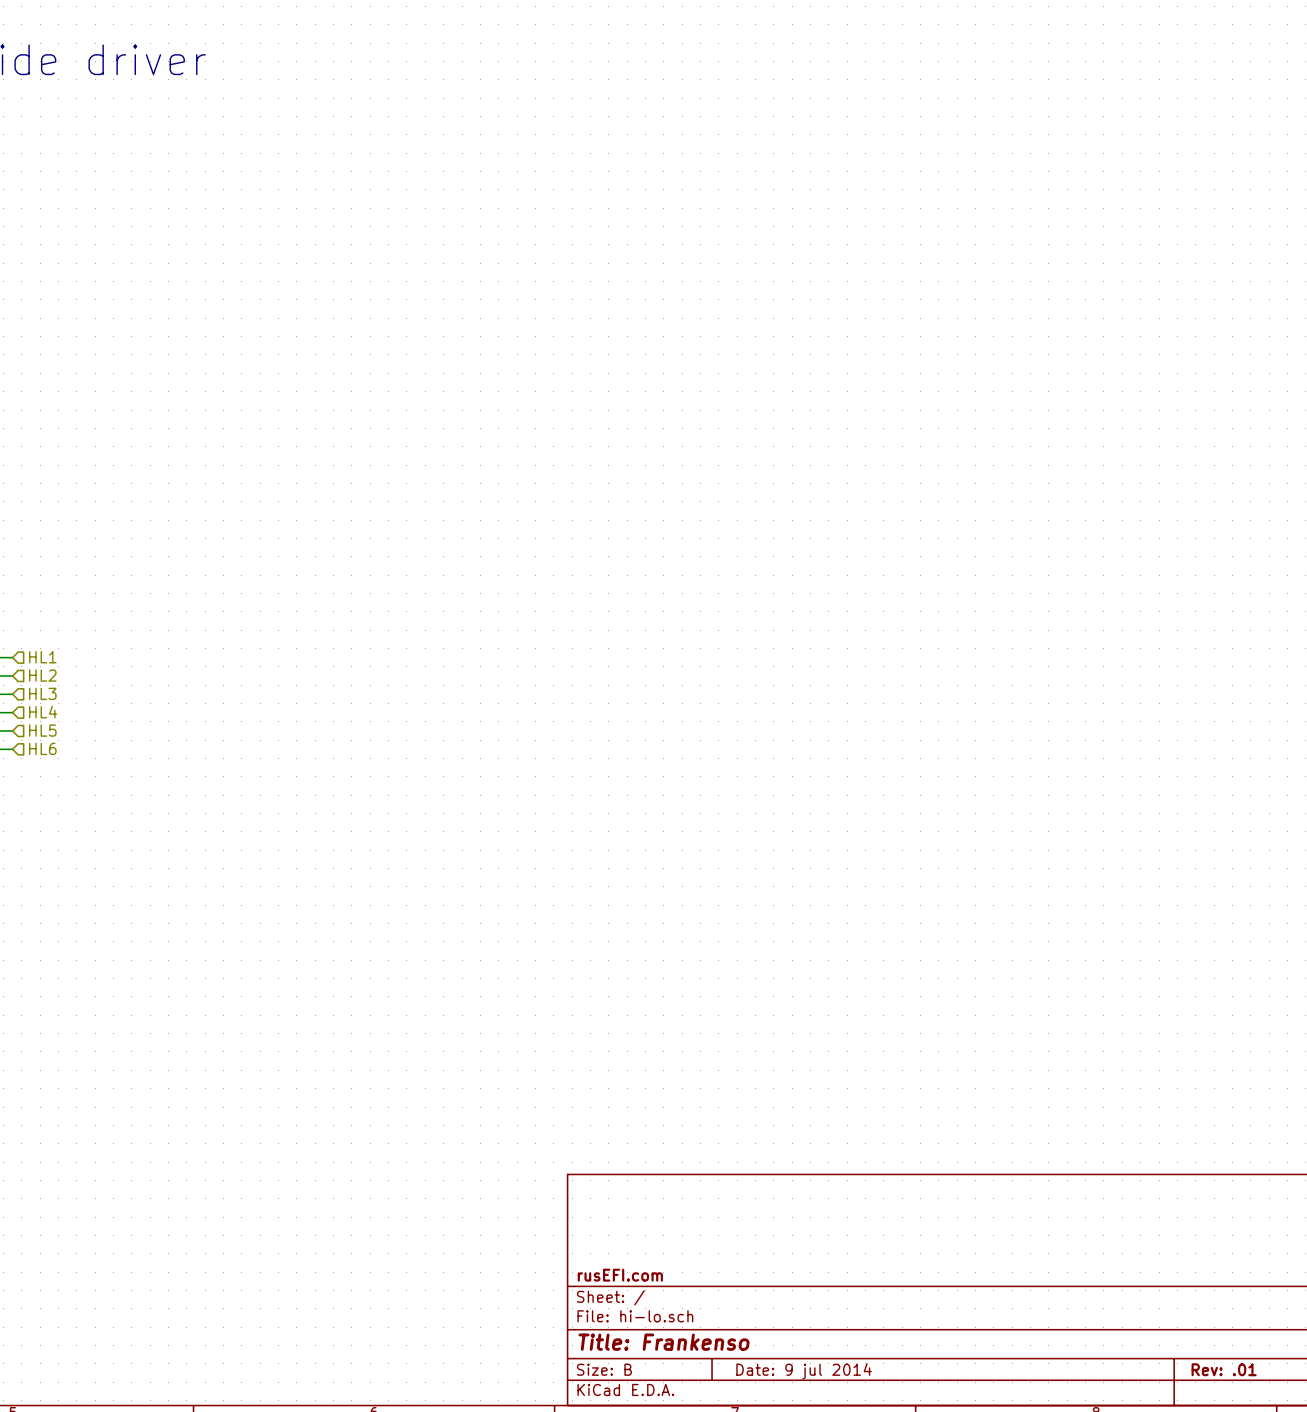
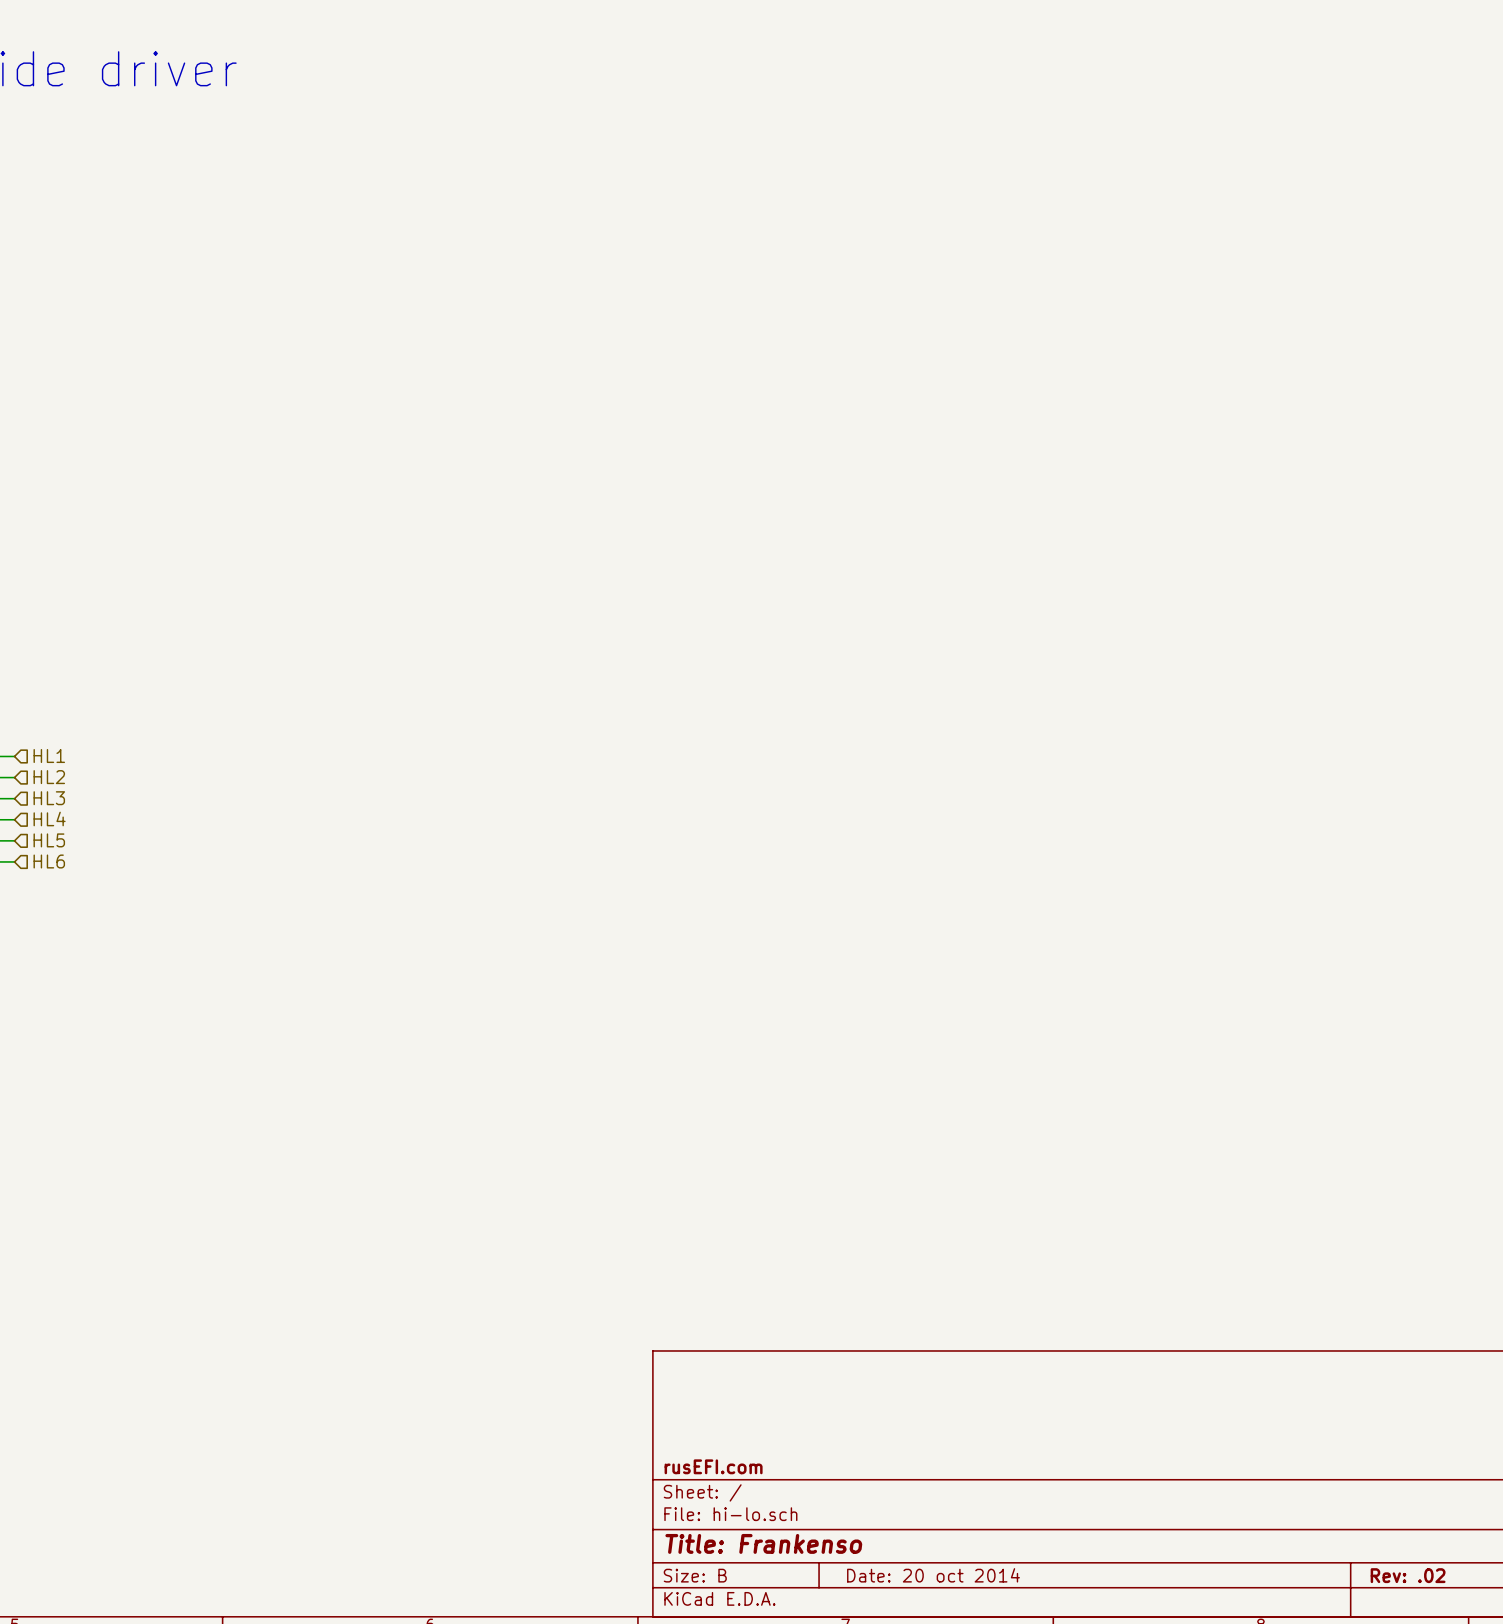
title block: Rev: .01 (1224, 1369) -> Rev: .02 (1408, 1575)
title block: Date: 9 jul 2014 (804, 1371) -> Date: 20 oct 2014 (933, 1575)

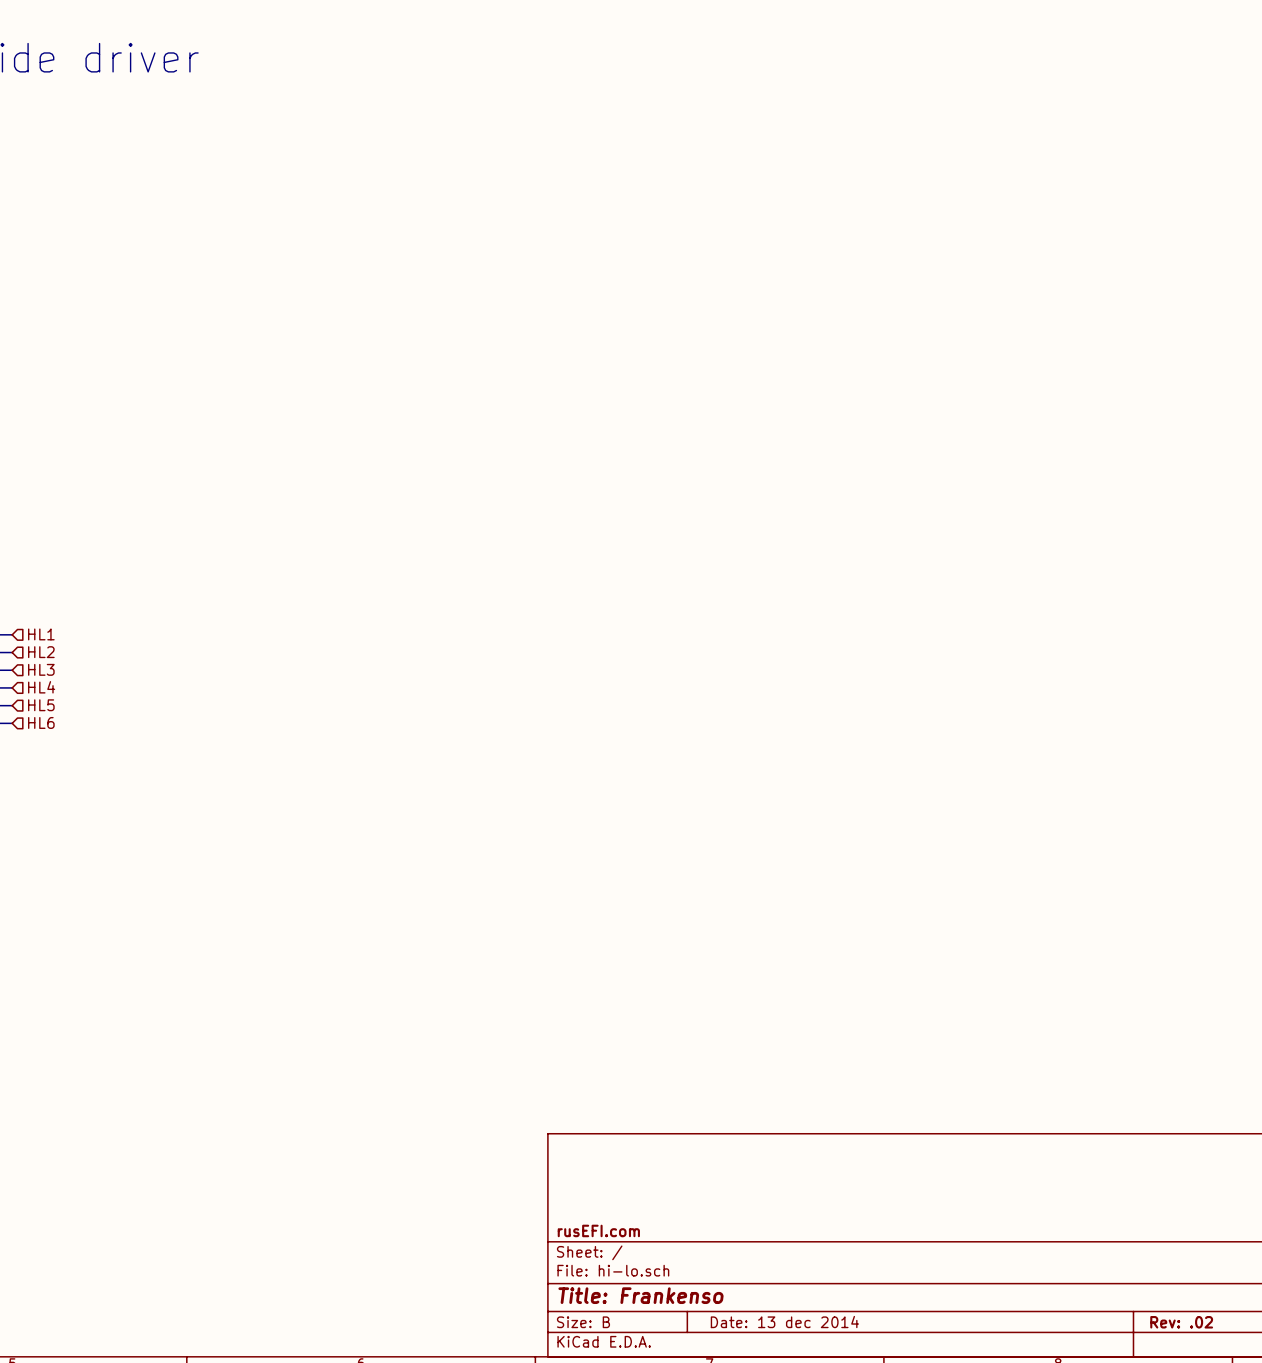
title block: Date: 20 oct 2014 (933, 1575) -> Date: 13 dec 2014 (784, 1322)

